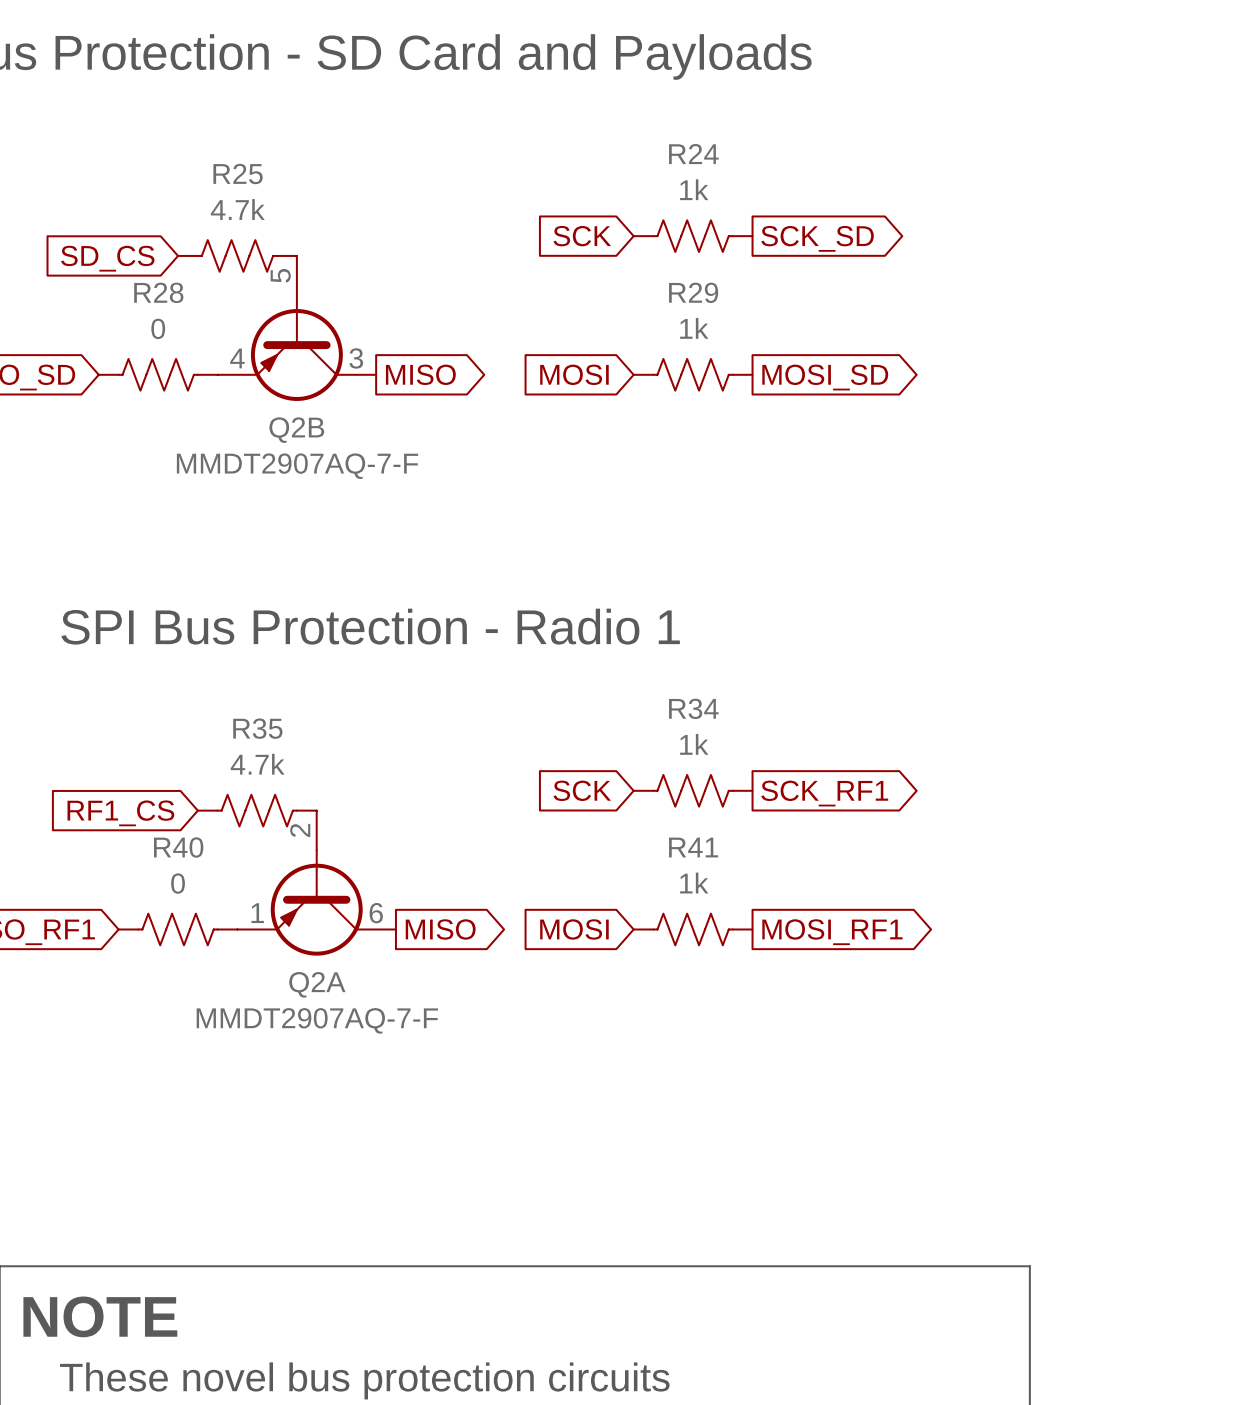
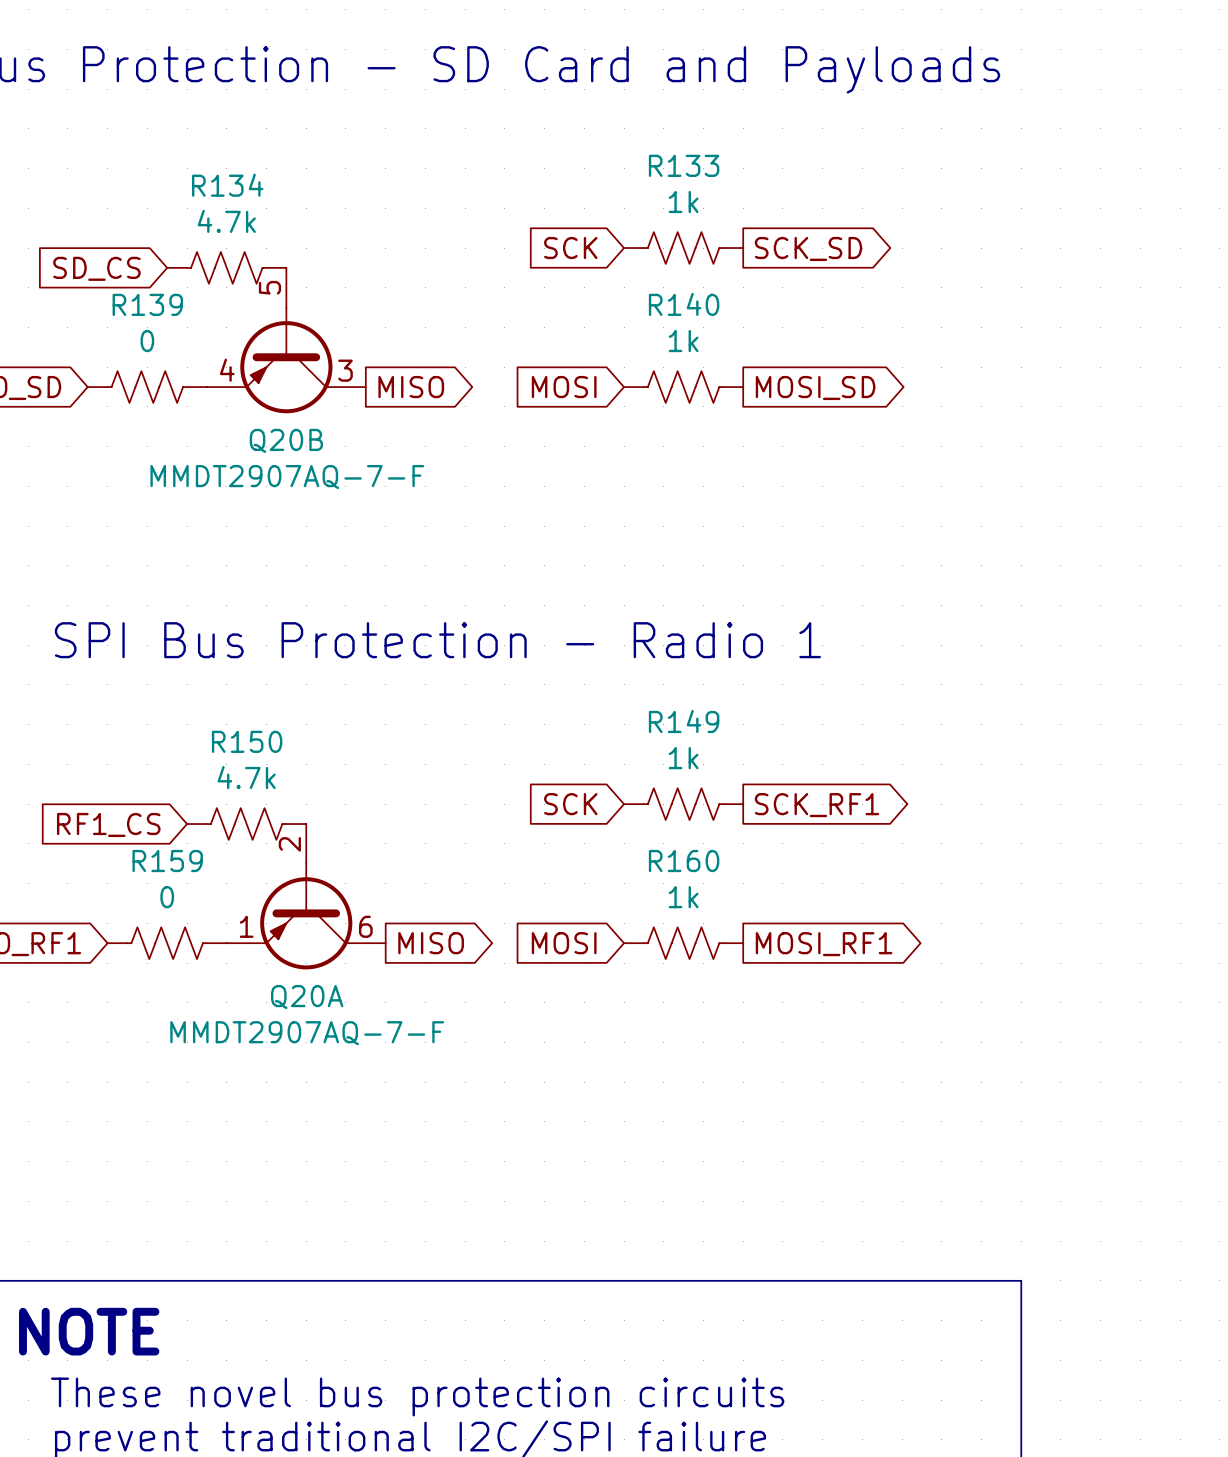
R24 name: R24 (693, 154) -> R133 (684, 165)
R25 name: R25 (238, 173) -> R134 (227, 185)
R28 name: R28 (158, 292) -> R139 (147, 304)
R29 name: R29 (693, 292) -> R140 (684, 304)
Q2B name: Q2B (296, 430) -> Q20B (286, 440)
R34 name: R34 (693, 708) -> R149 (684, 721)
R35 name: R35 (257, 728) -> R150 (247, 741)
R40 name: R40 (178, 847) -> R159 (167, 861)
R41 name: R41 (693, 847) -> R160 (684, 861)
Q2A name: Q2A (317, 984) -> Q20A (307, 997)

